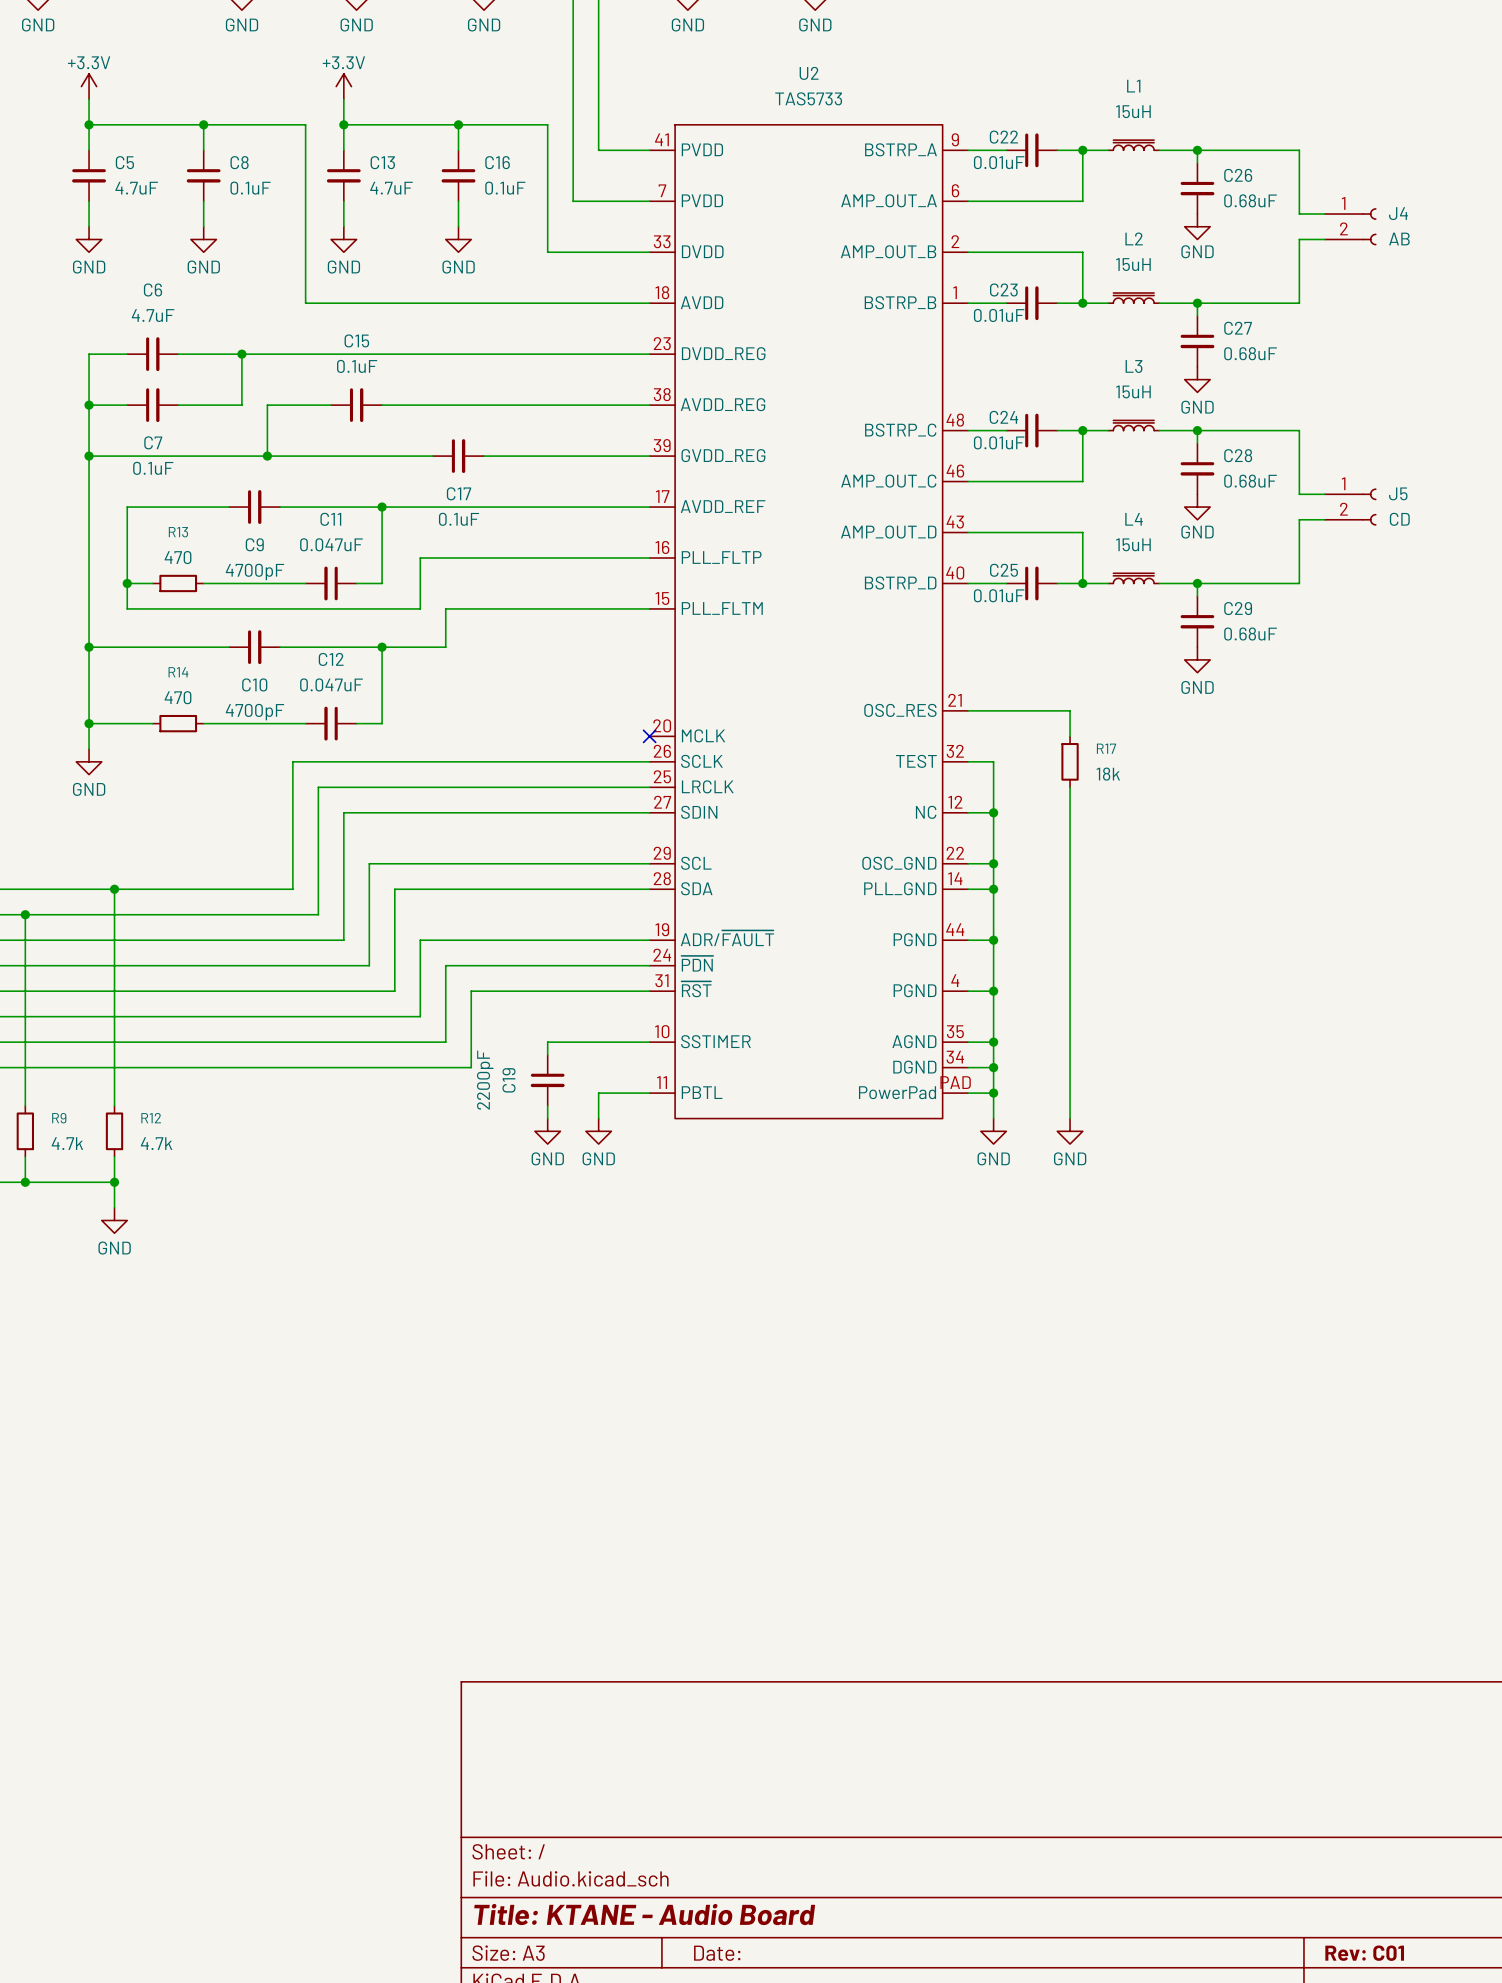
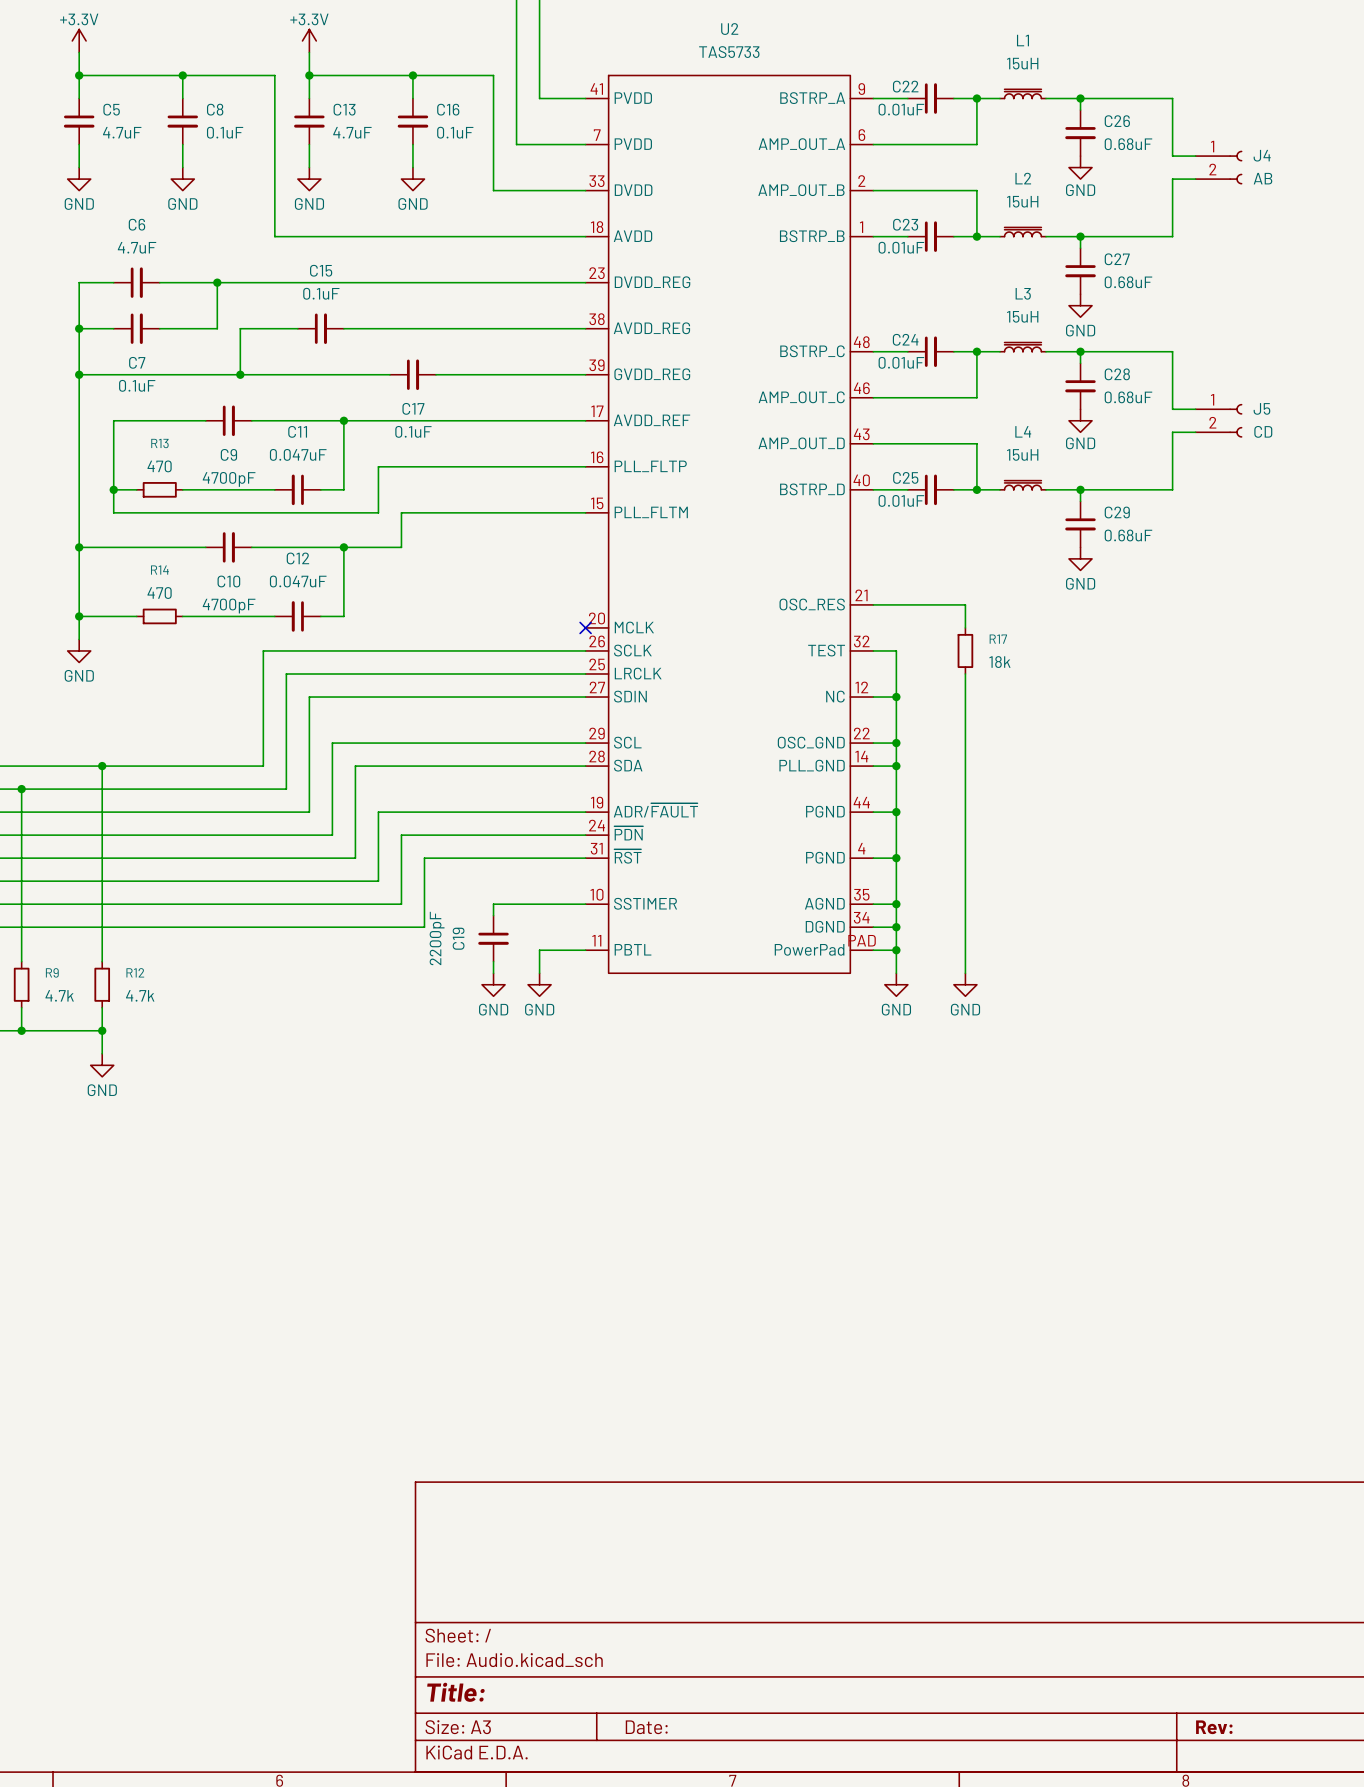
title block: Title: KTANE - Audio Board (644, 1914) -> Title: (455, 1692)
title block: Rev: C01 (1364, 1953) -> Rev: (1214, 1727)

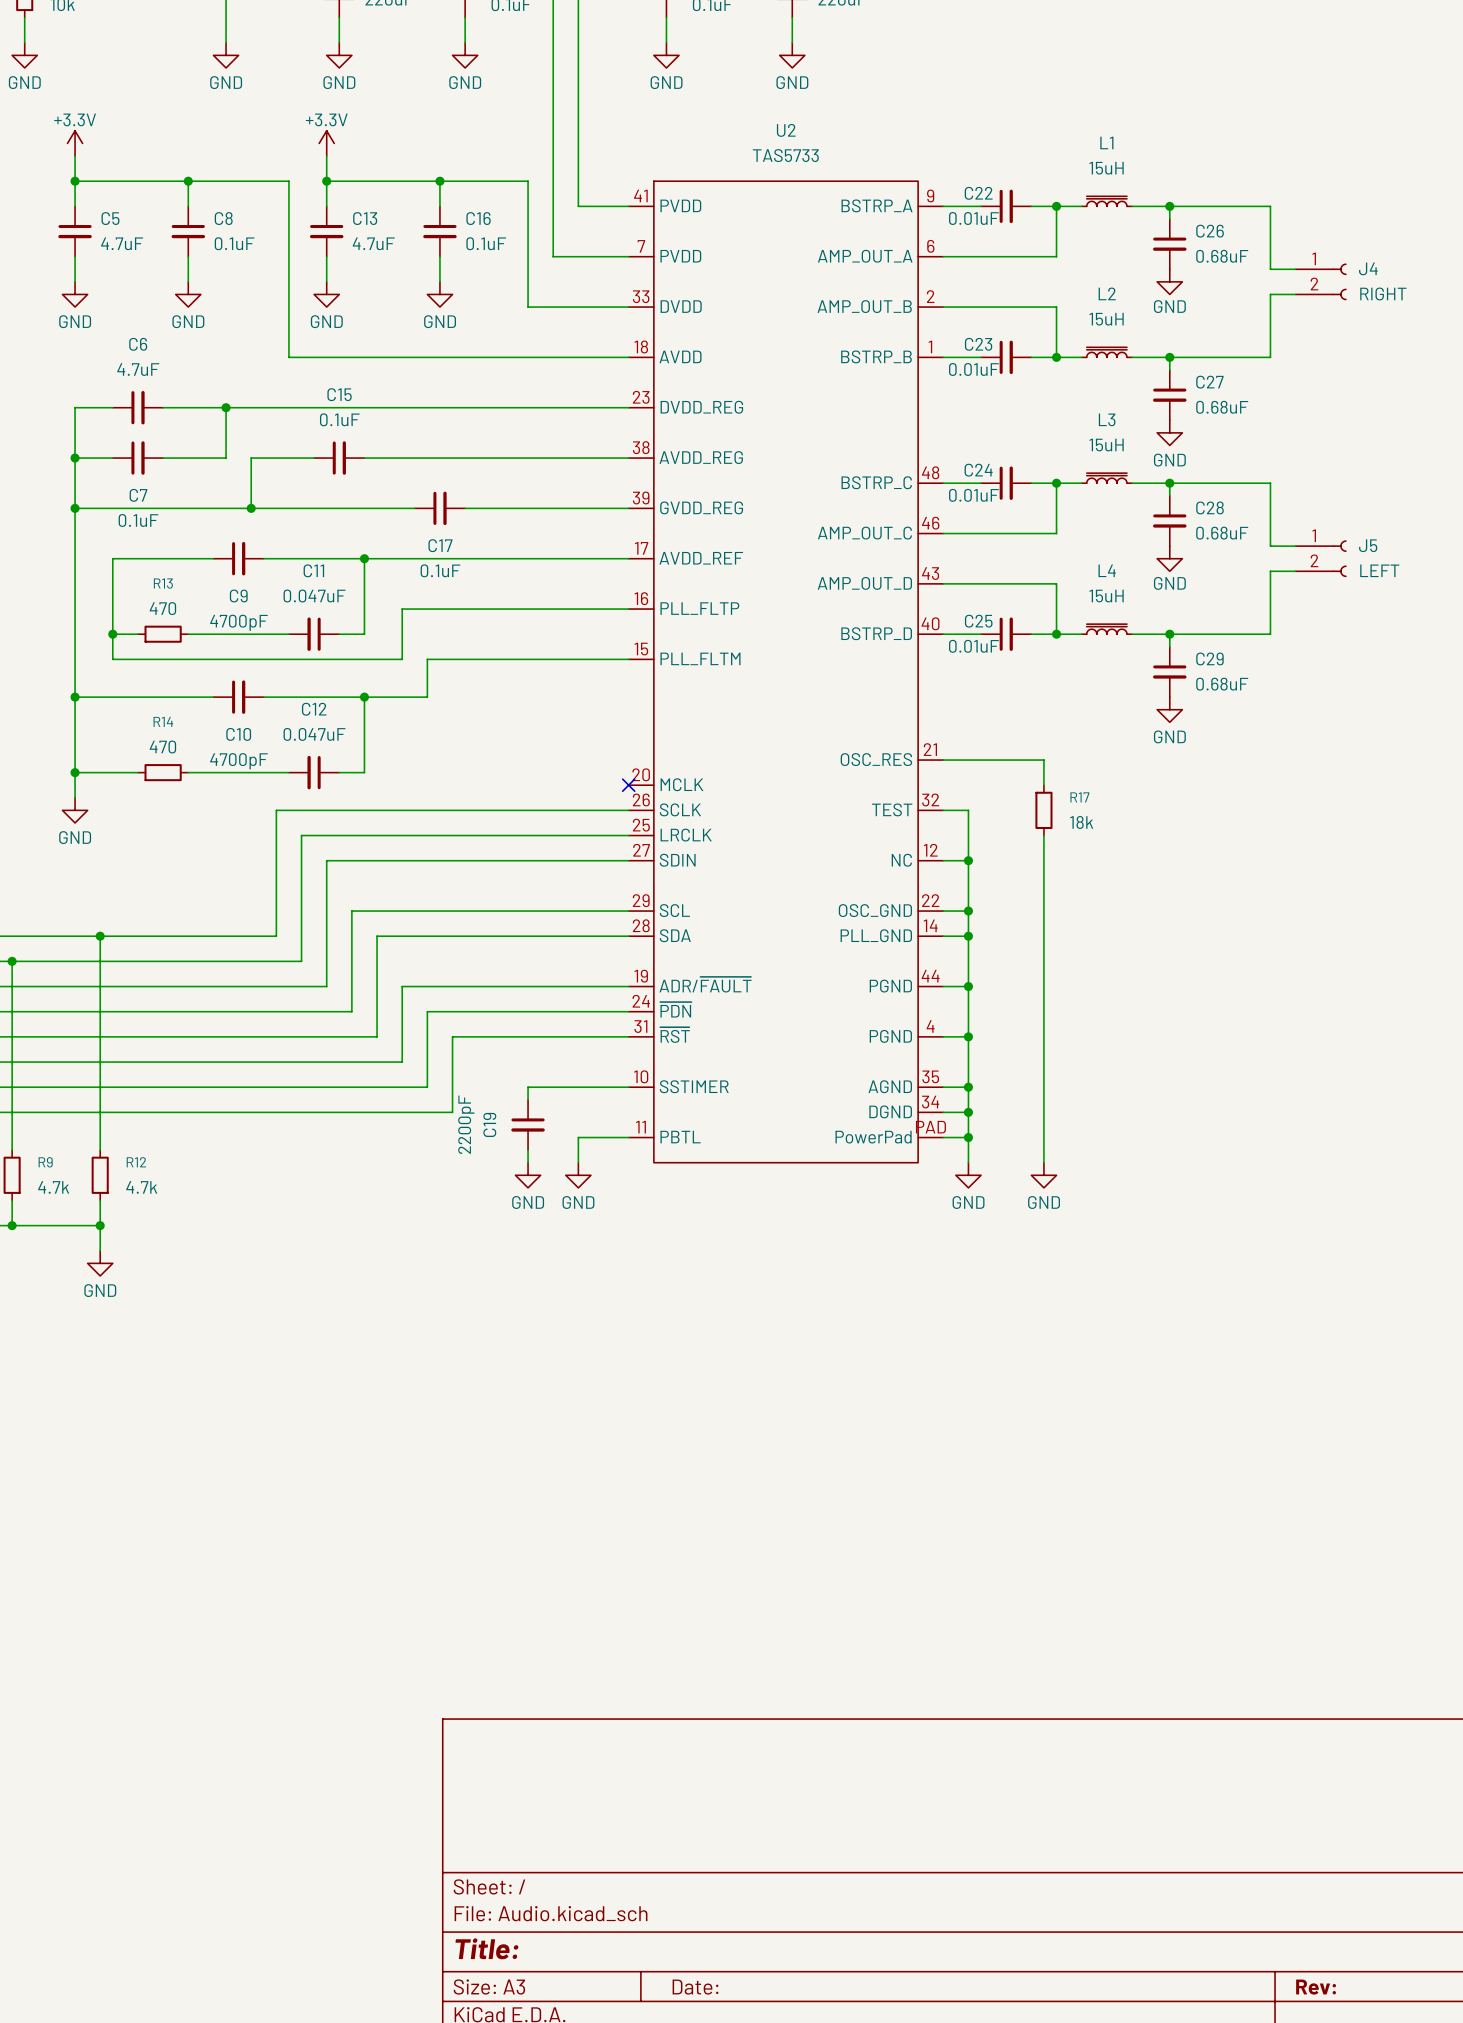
J4 value: AB (1262, 178) -> RIGHT (1383, 293)
J5 value: CD (1263, 431) -> LEFT (1379, 570)

